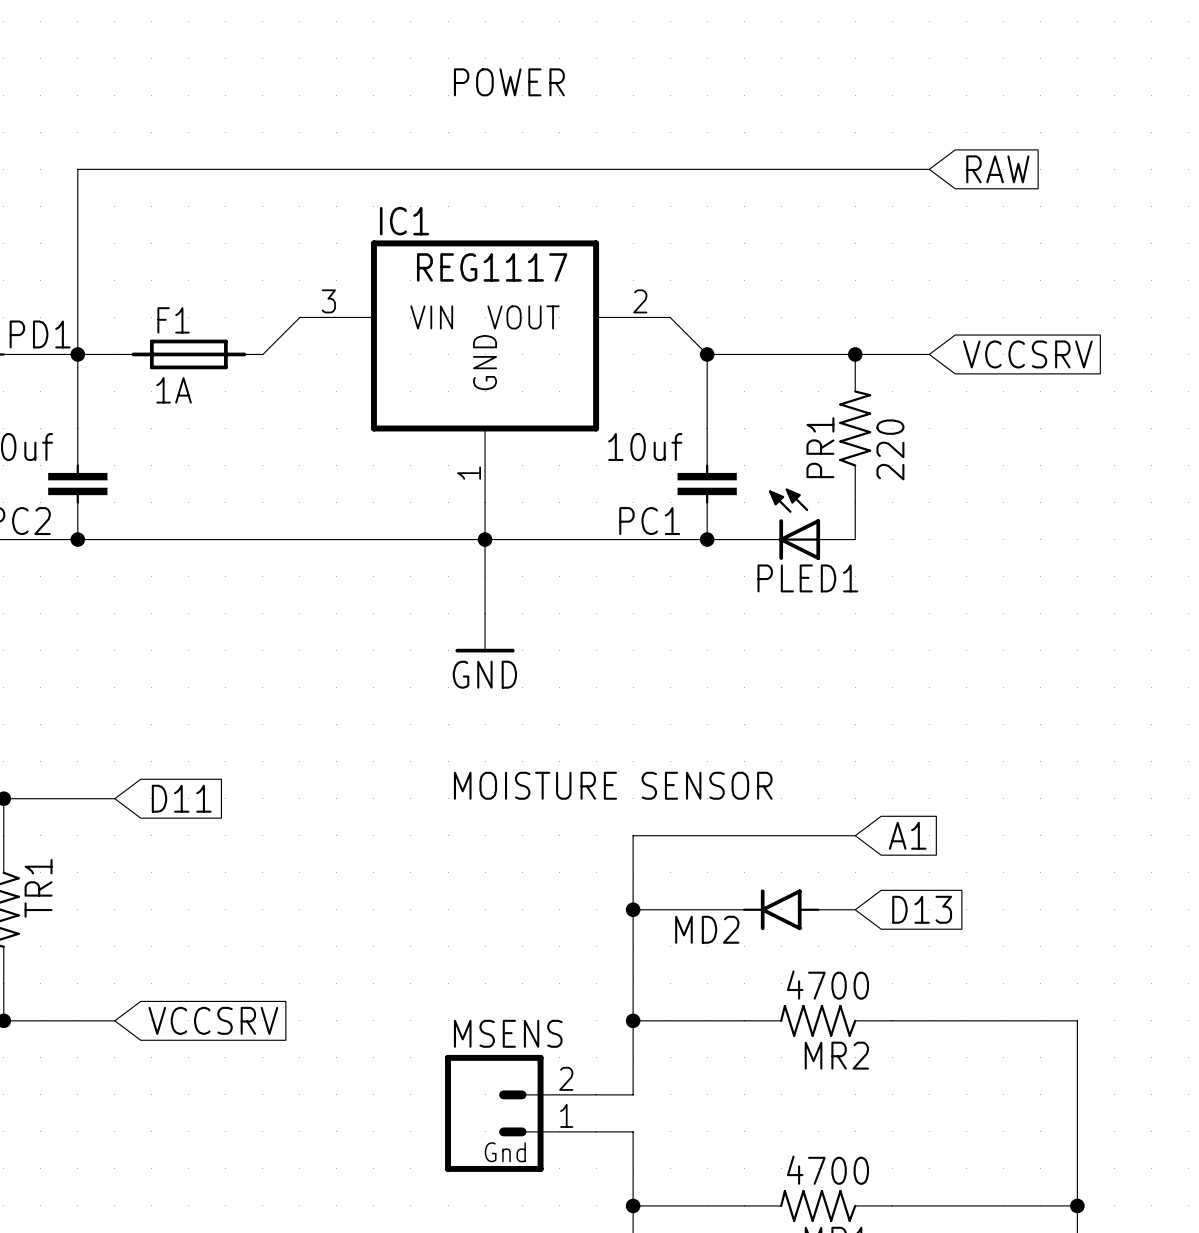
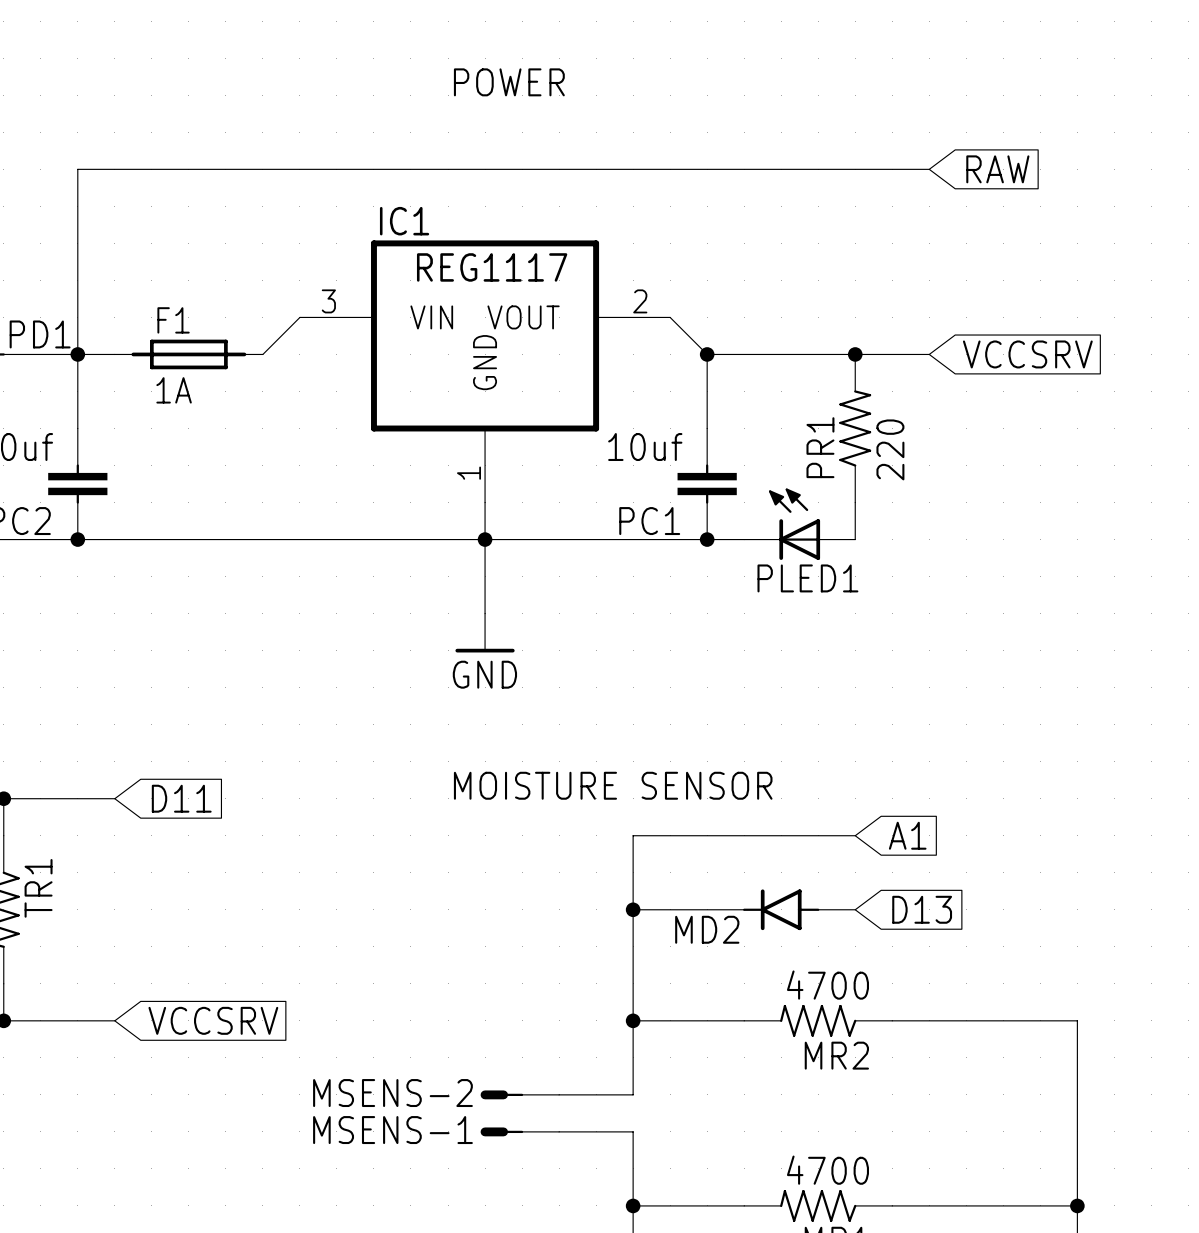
MSENS-2: none -> (519, 1094)
MSENS: (520, 1113) -> none
MSENS-1: none -> (519, 1131)

